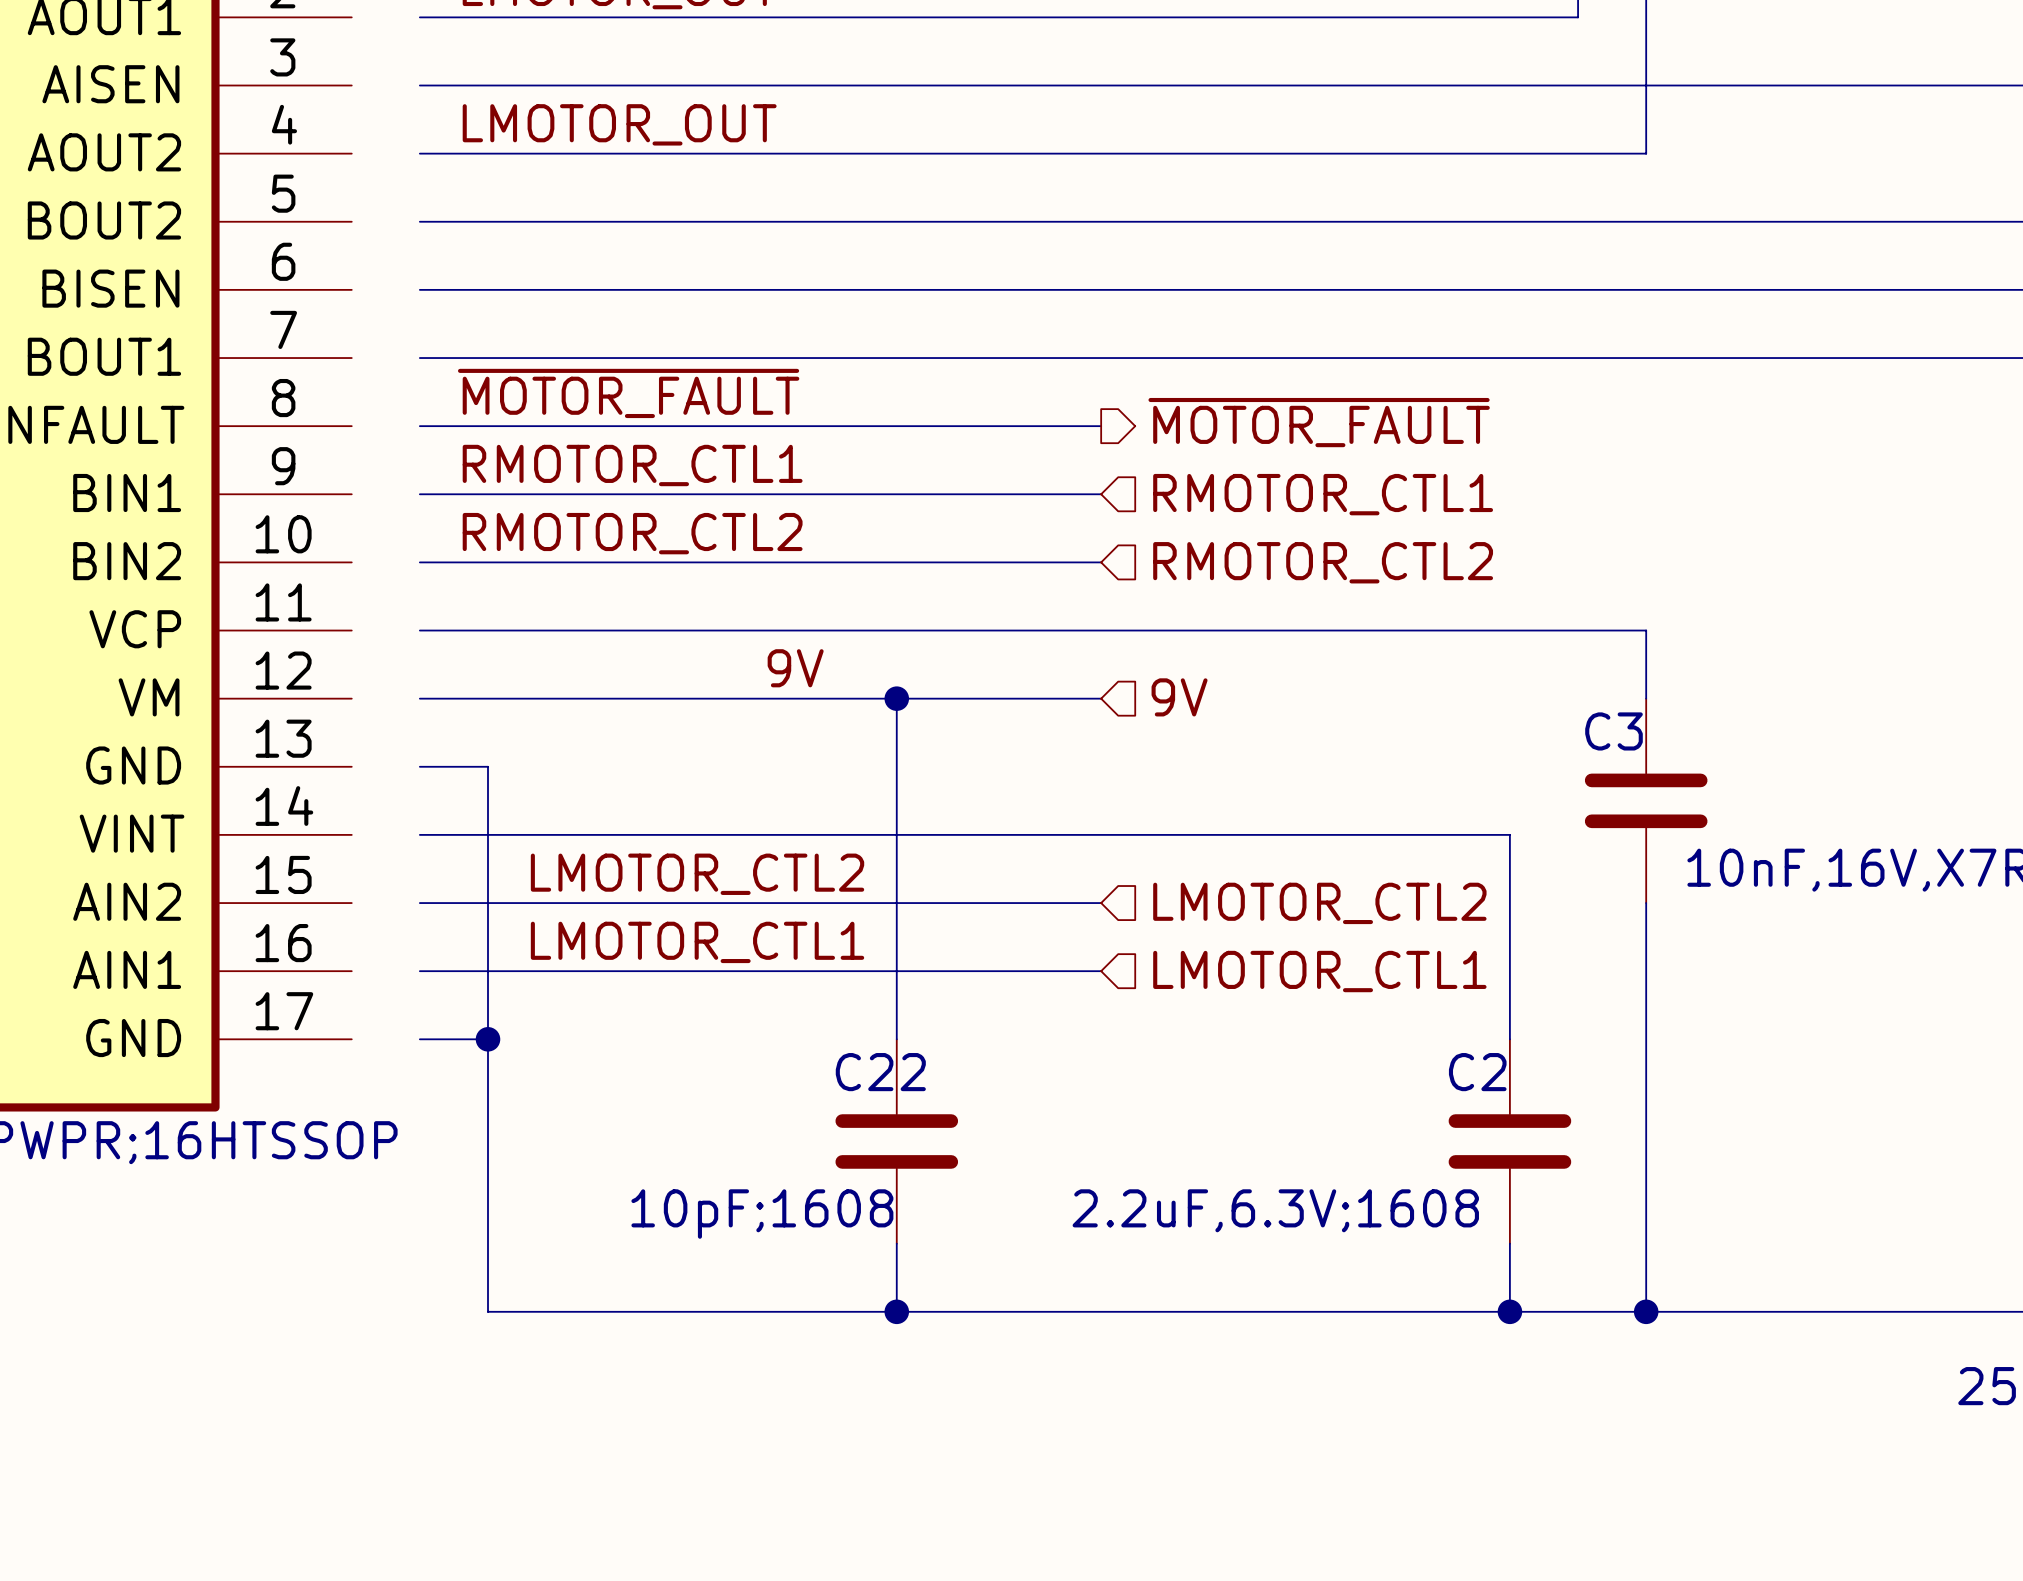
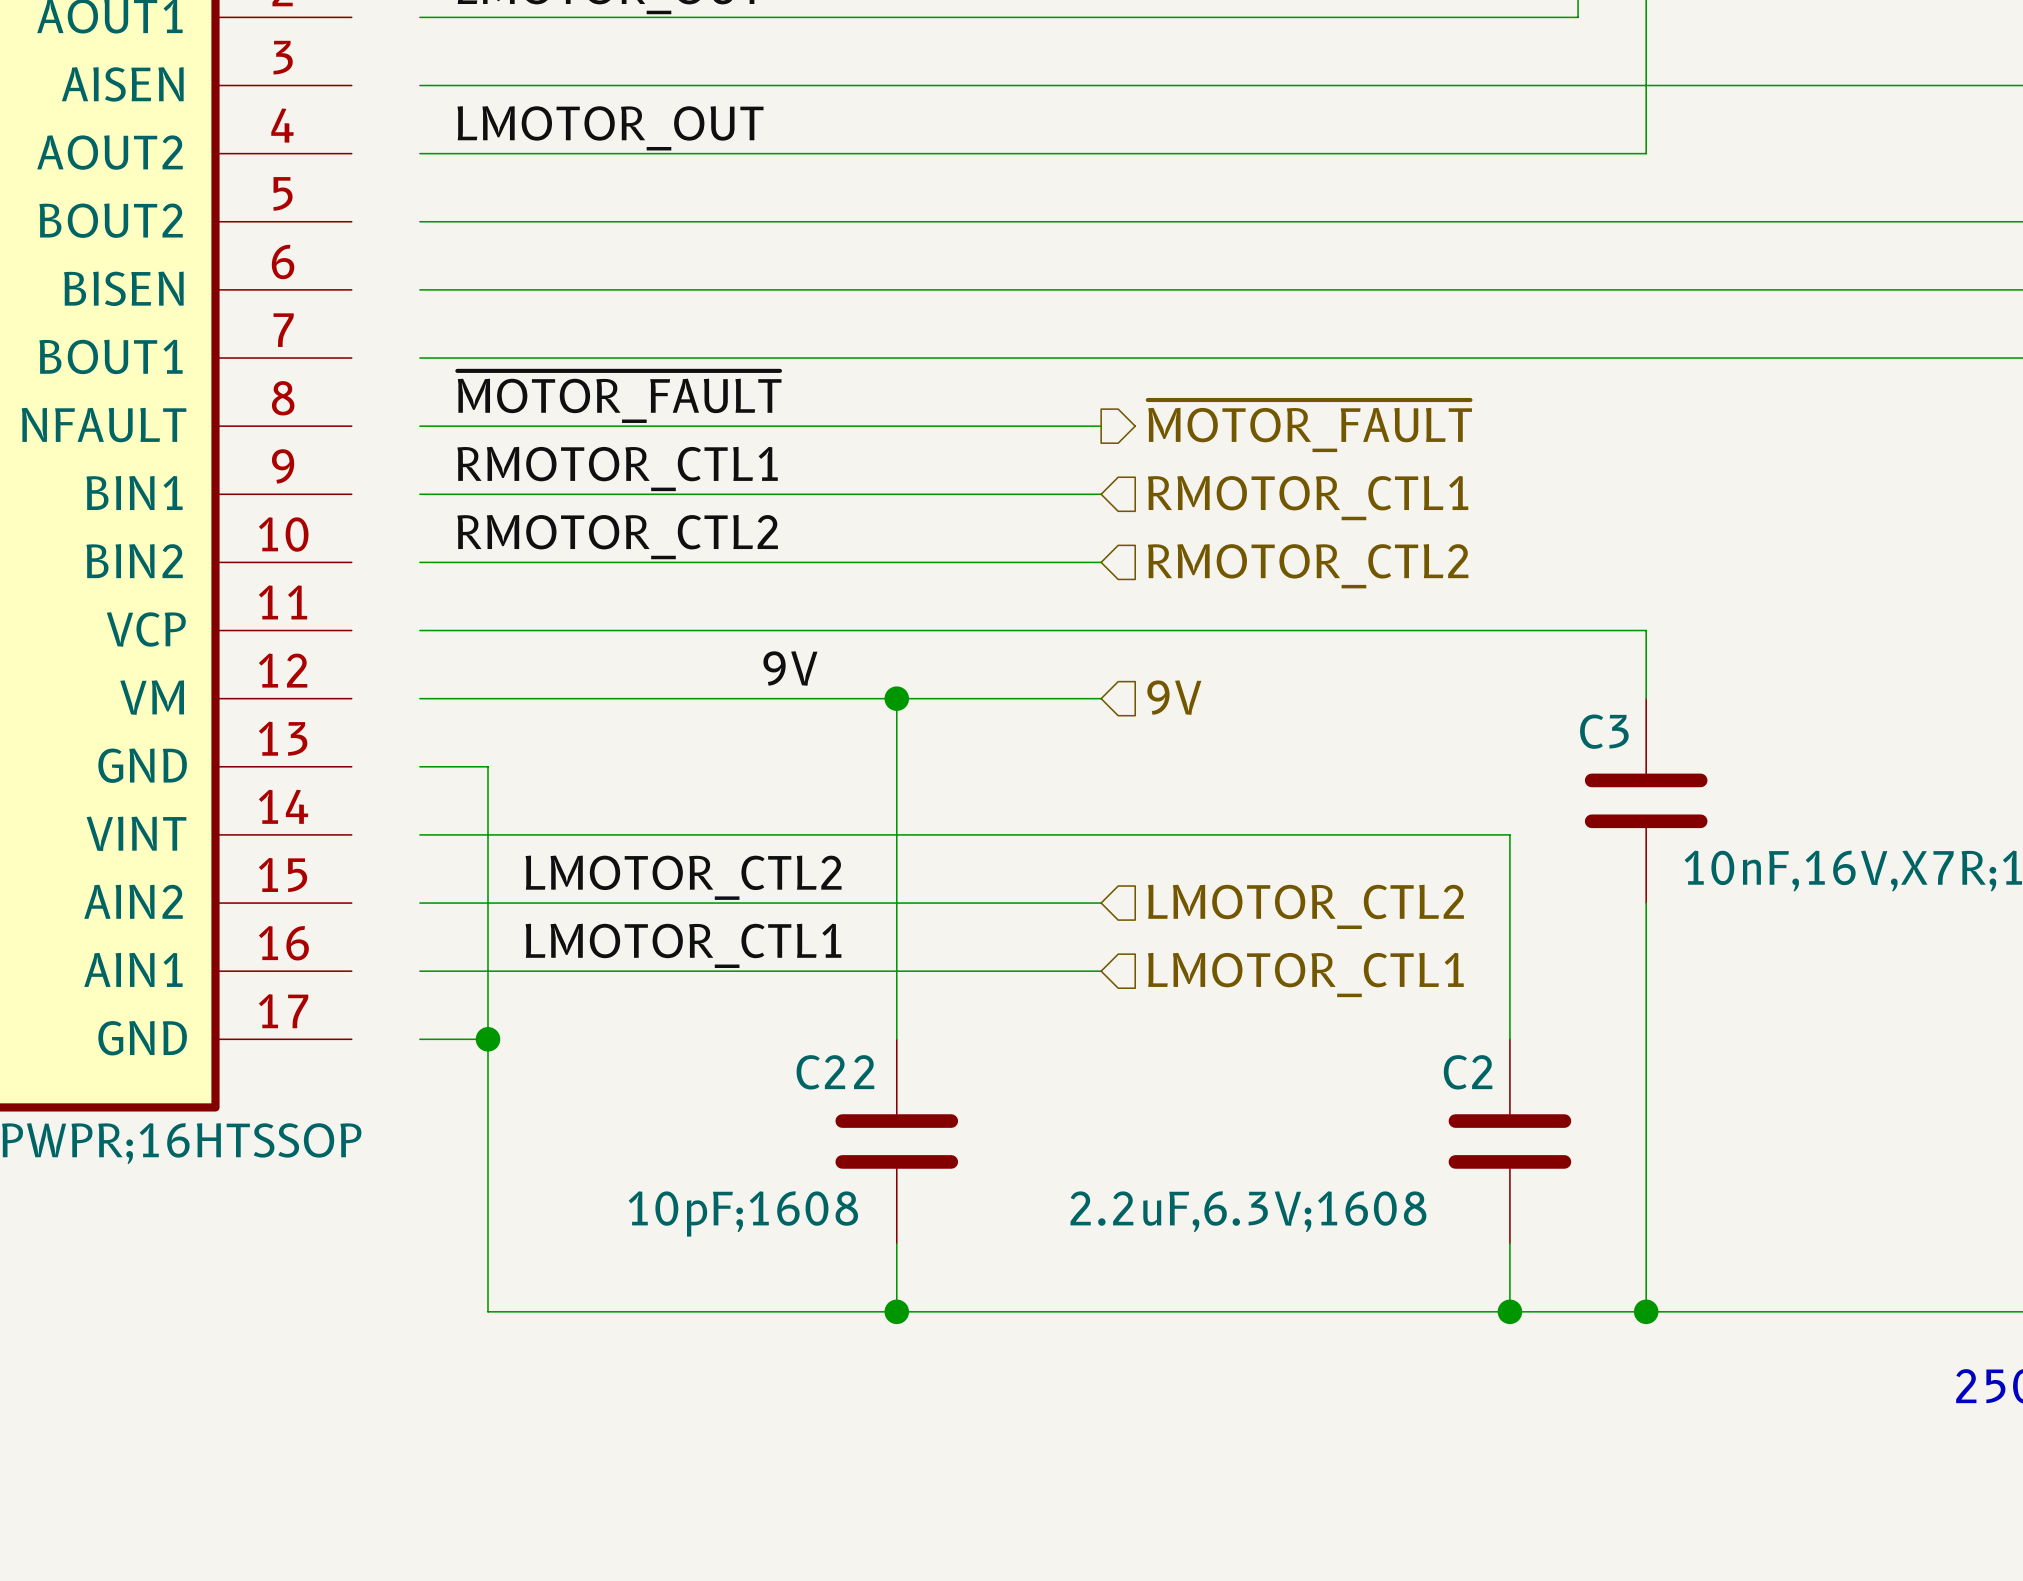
C22 name position: C22 (880, 1072) -> C22 (835, 1072)

